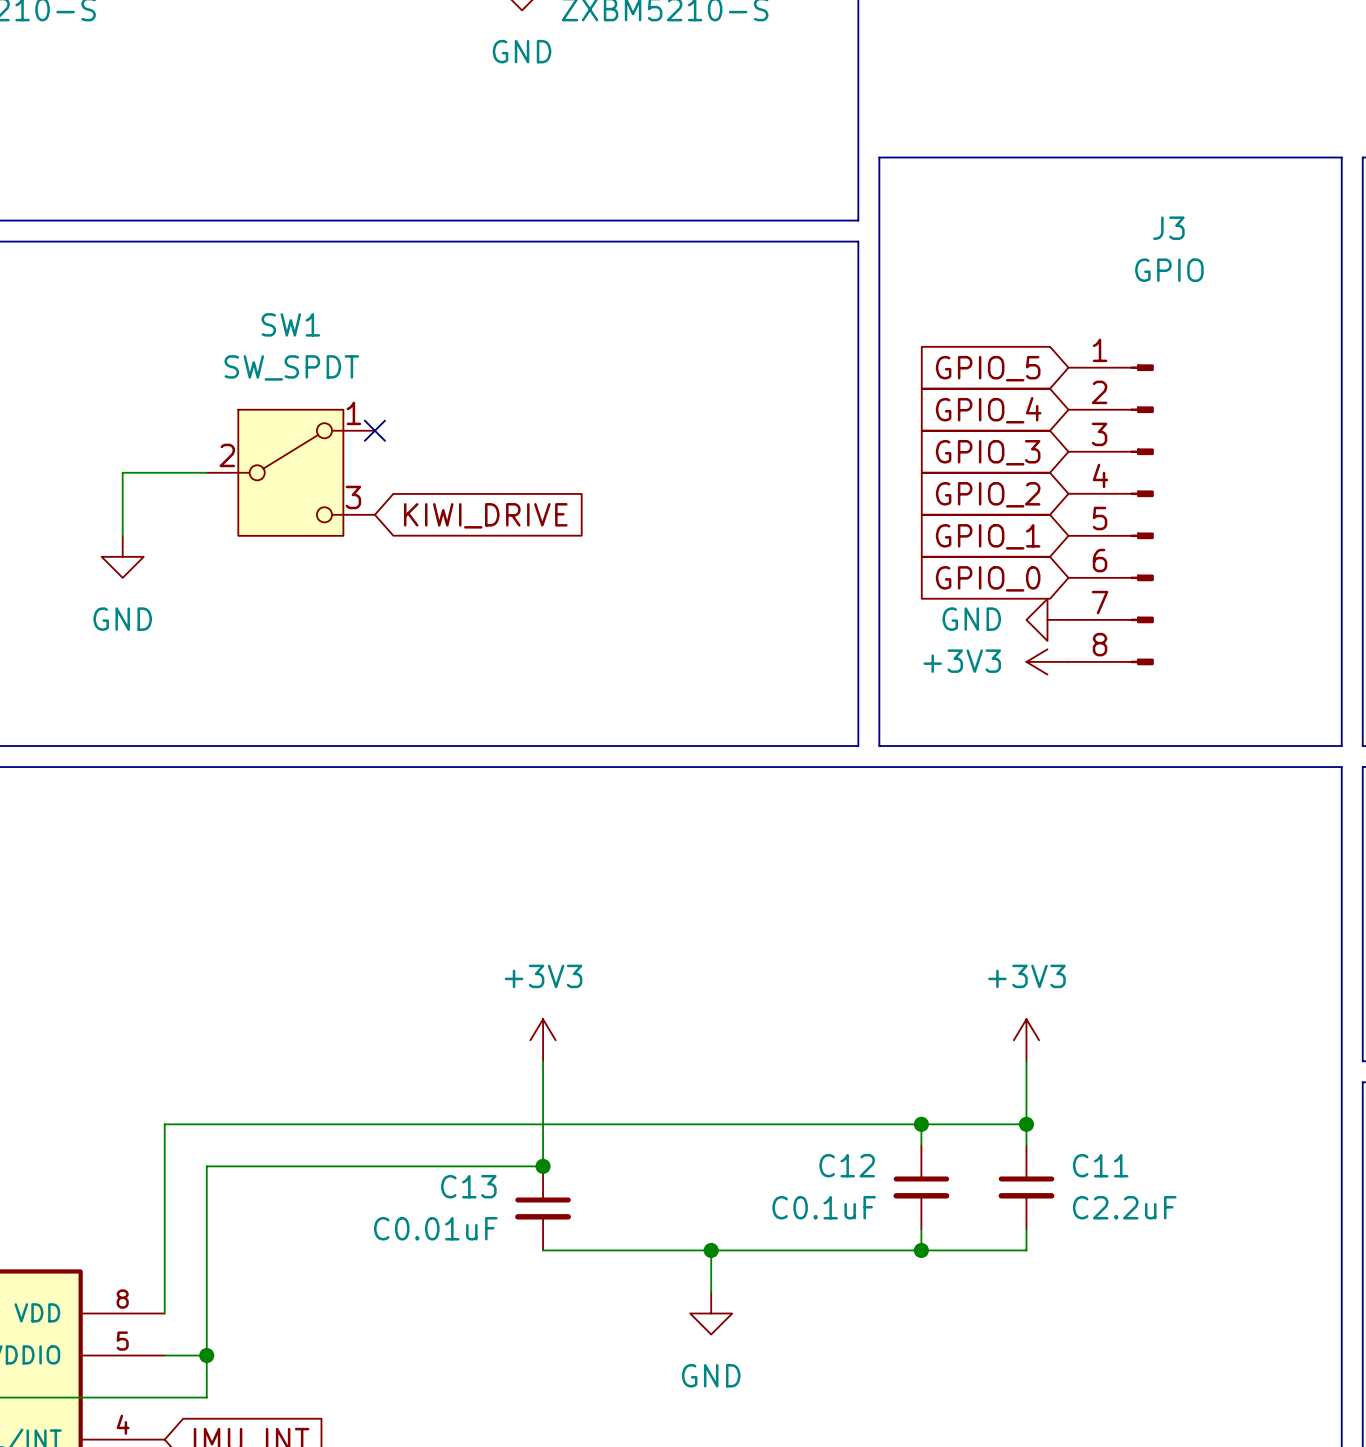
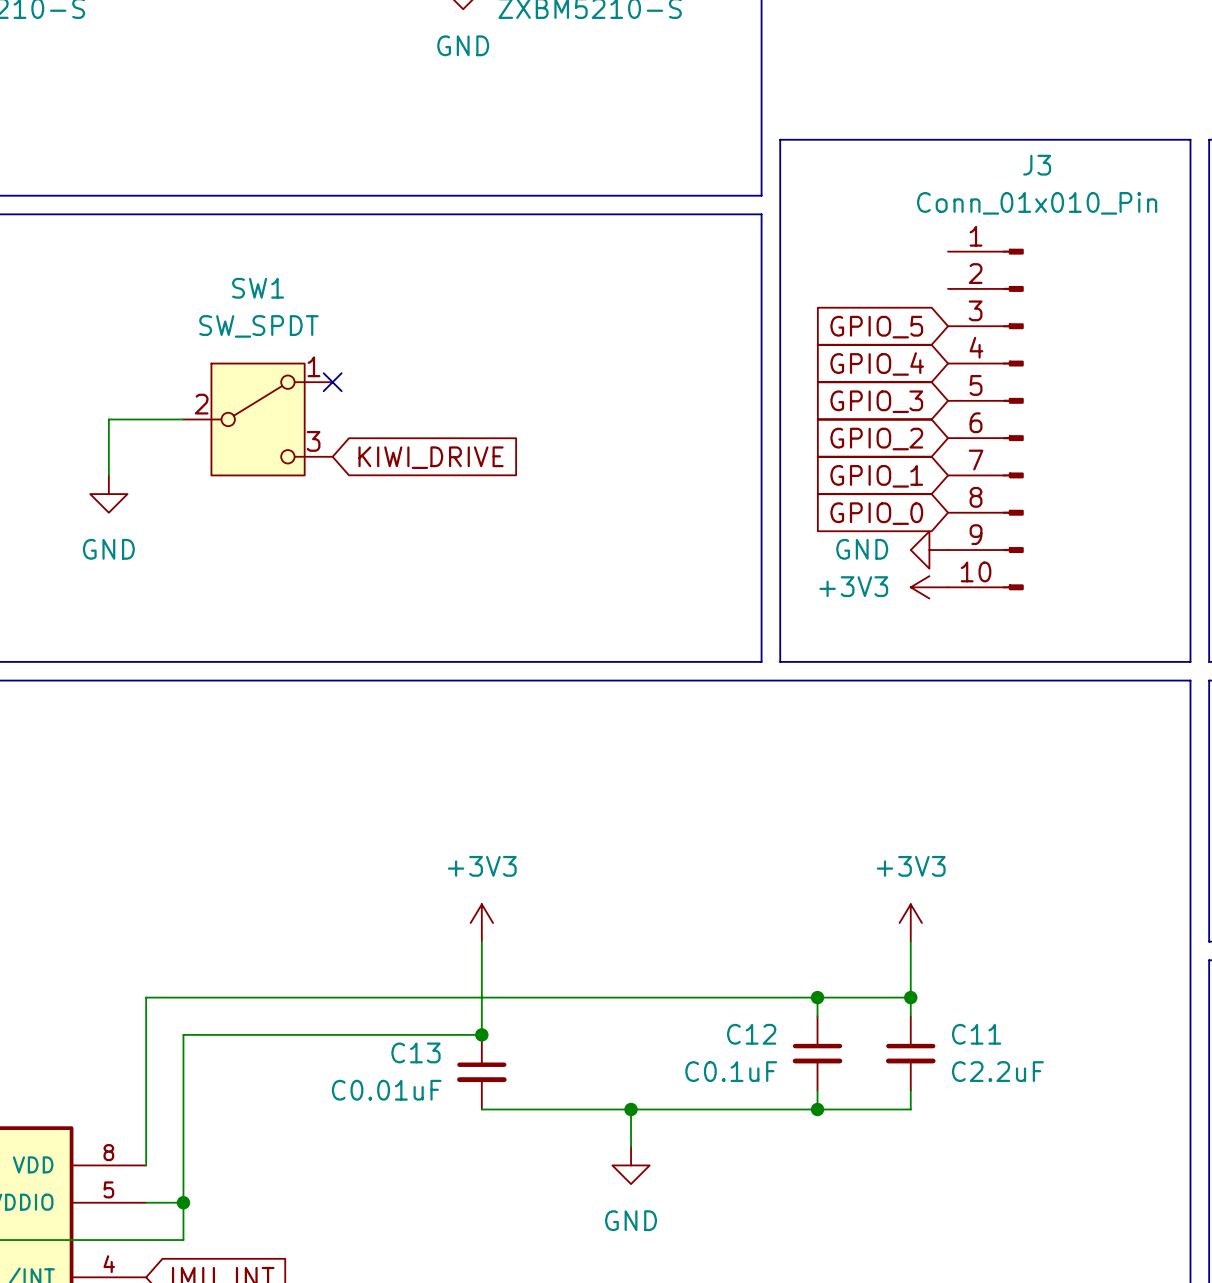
J3 value: GPIO (1169, 270) -> Conn_01x010_Pin (1037, 203)
J3 symbol: [1068, 364, 1154, 666] -> [948, 248, 1024, 591]

